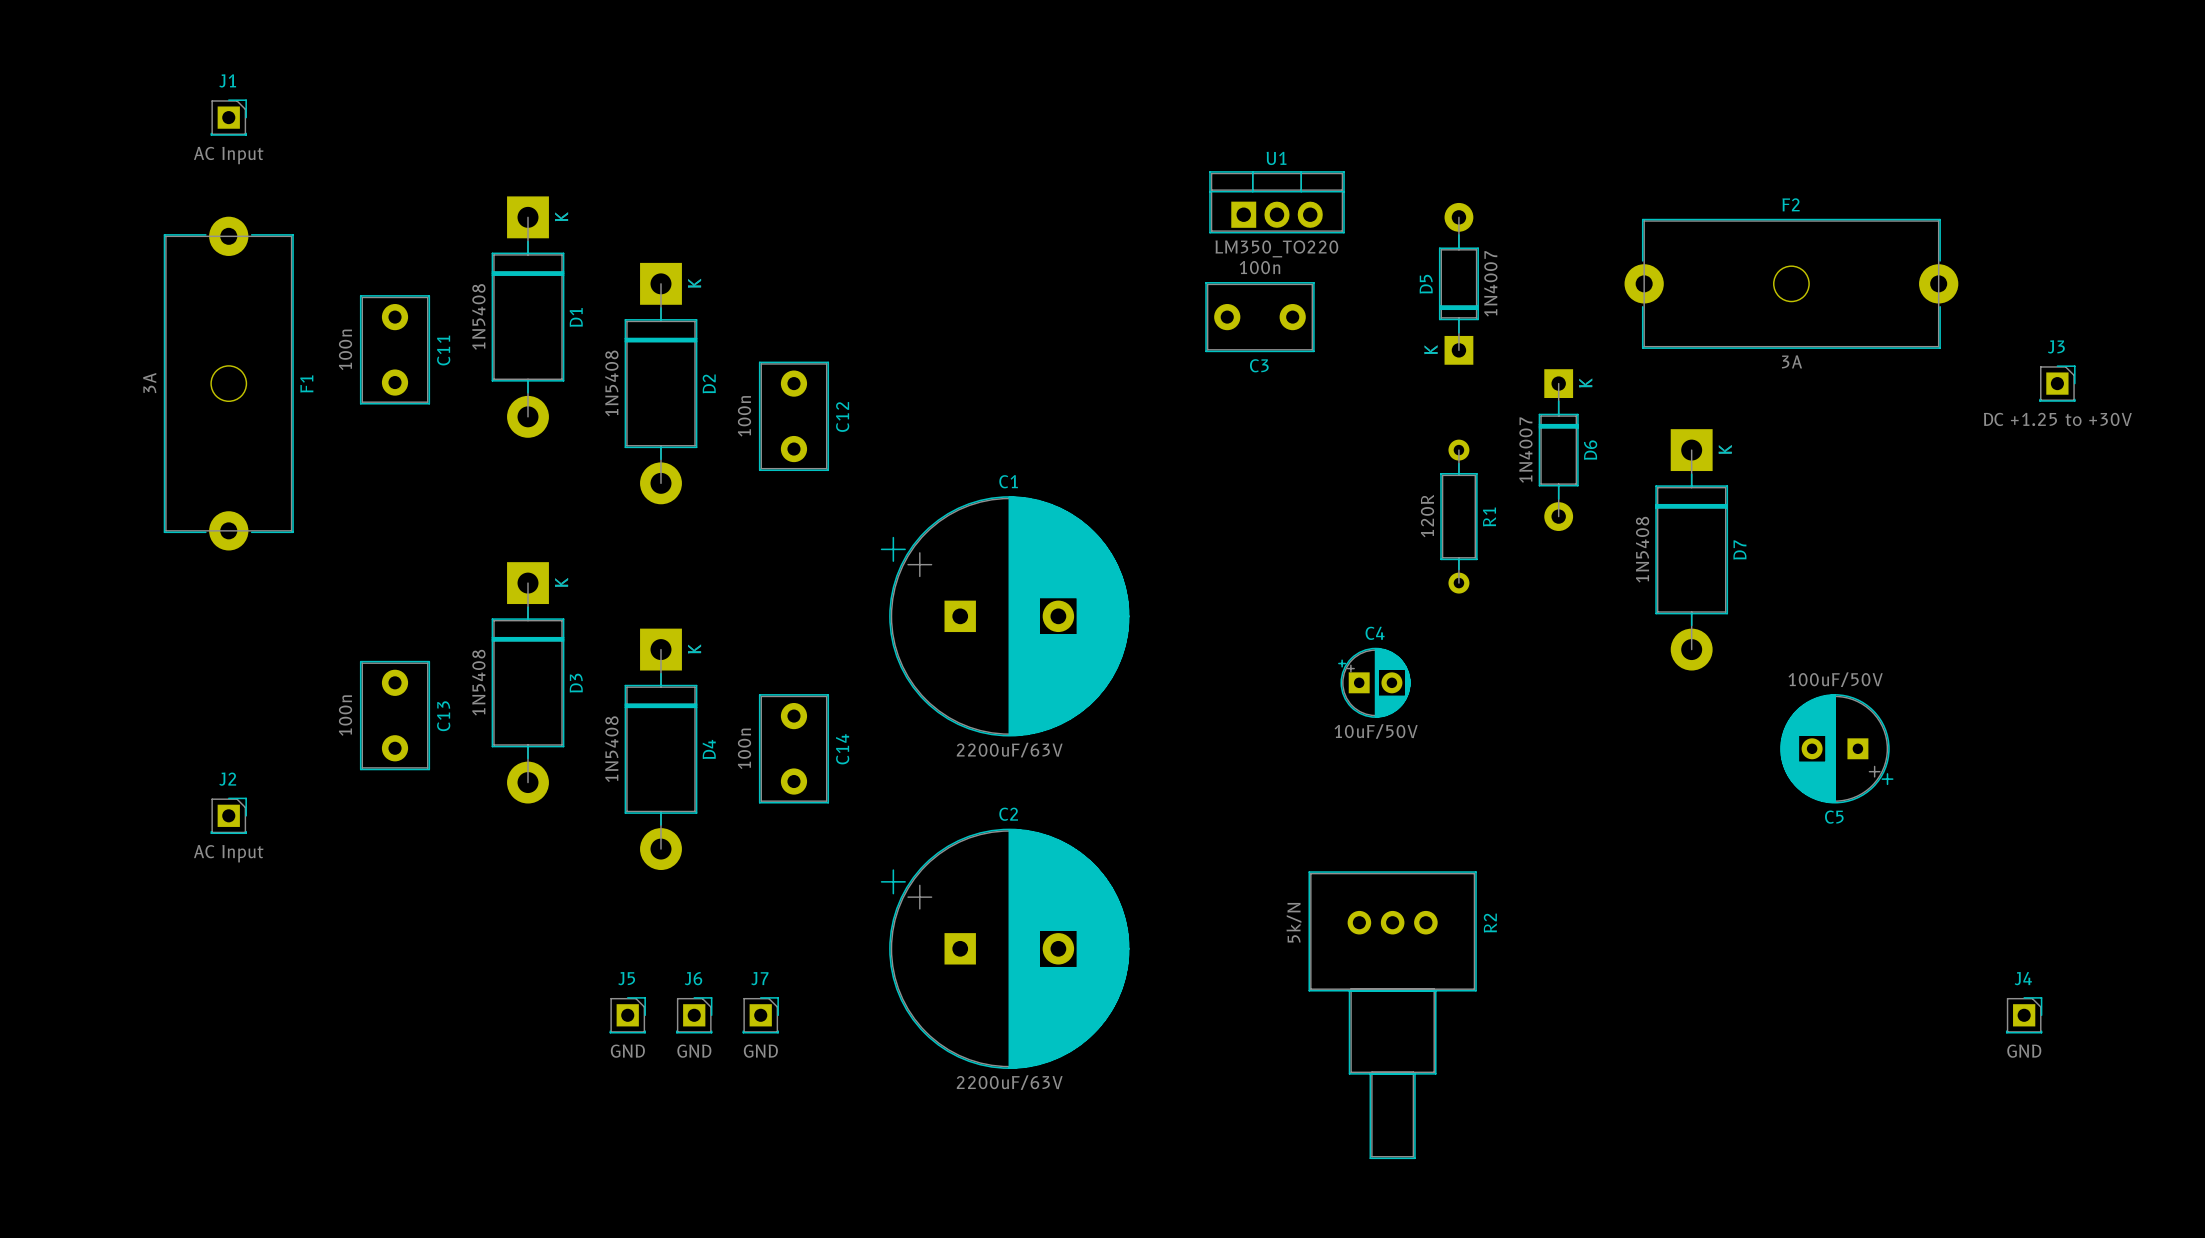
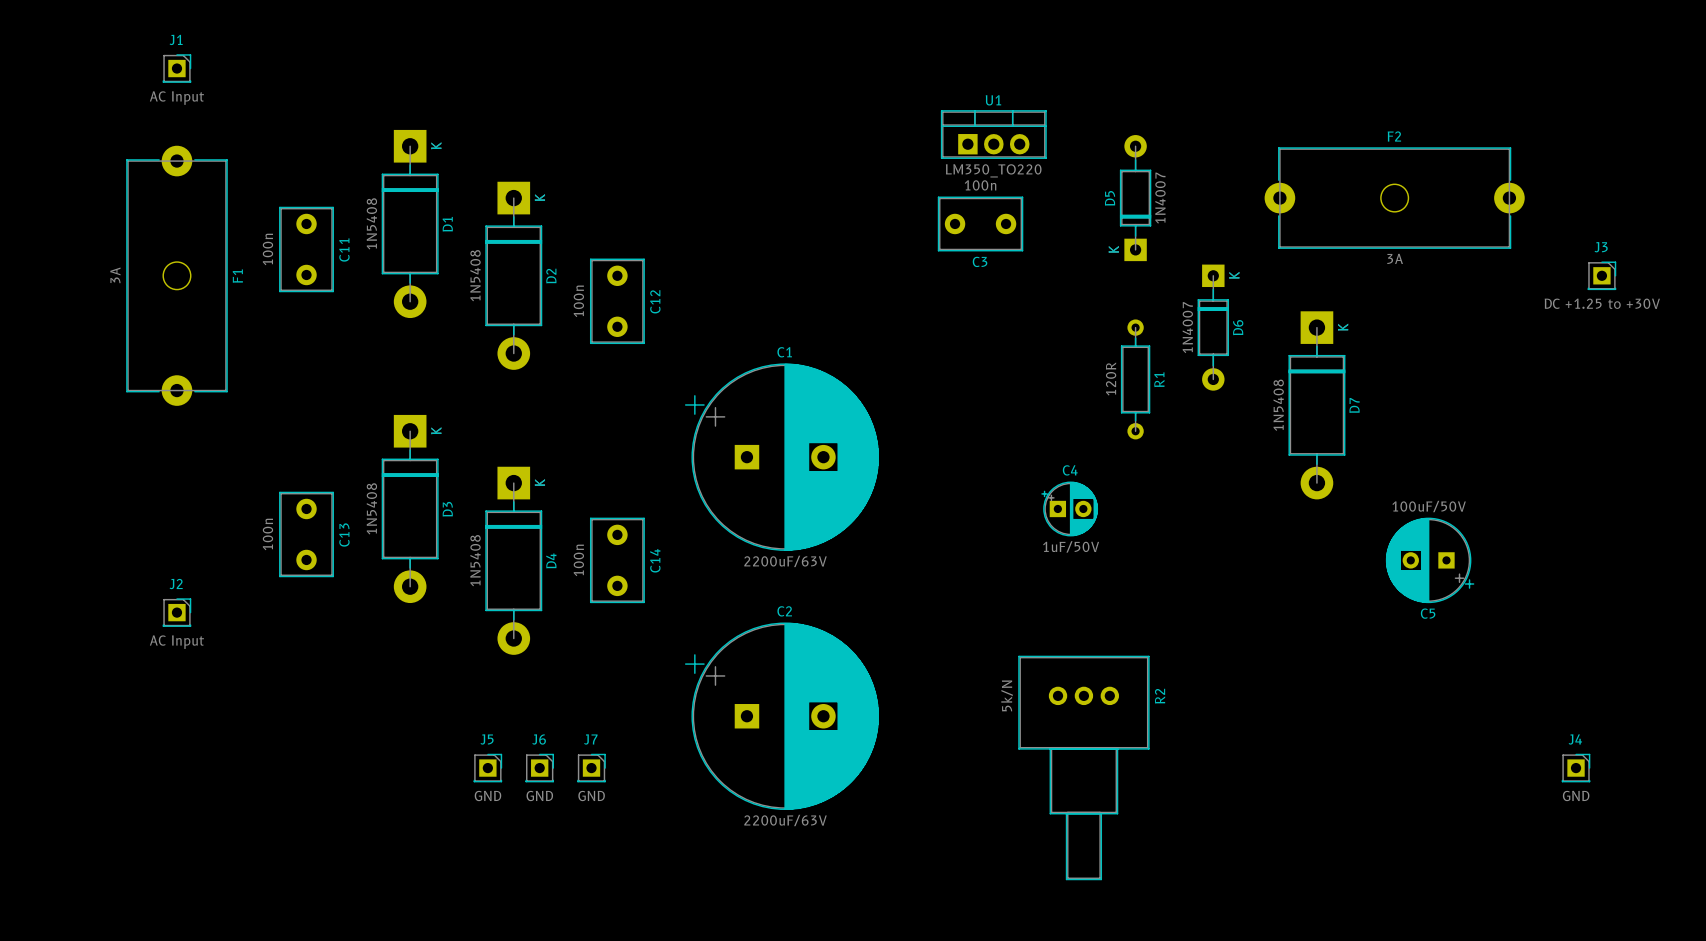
C4 value: 10uF/50V (1376, 731) -> 1uF/50V (1071, 546)

